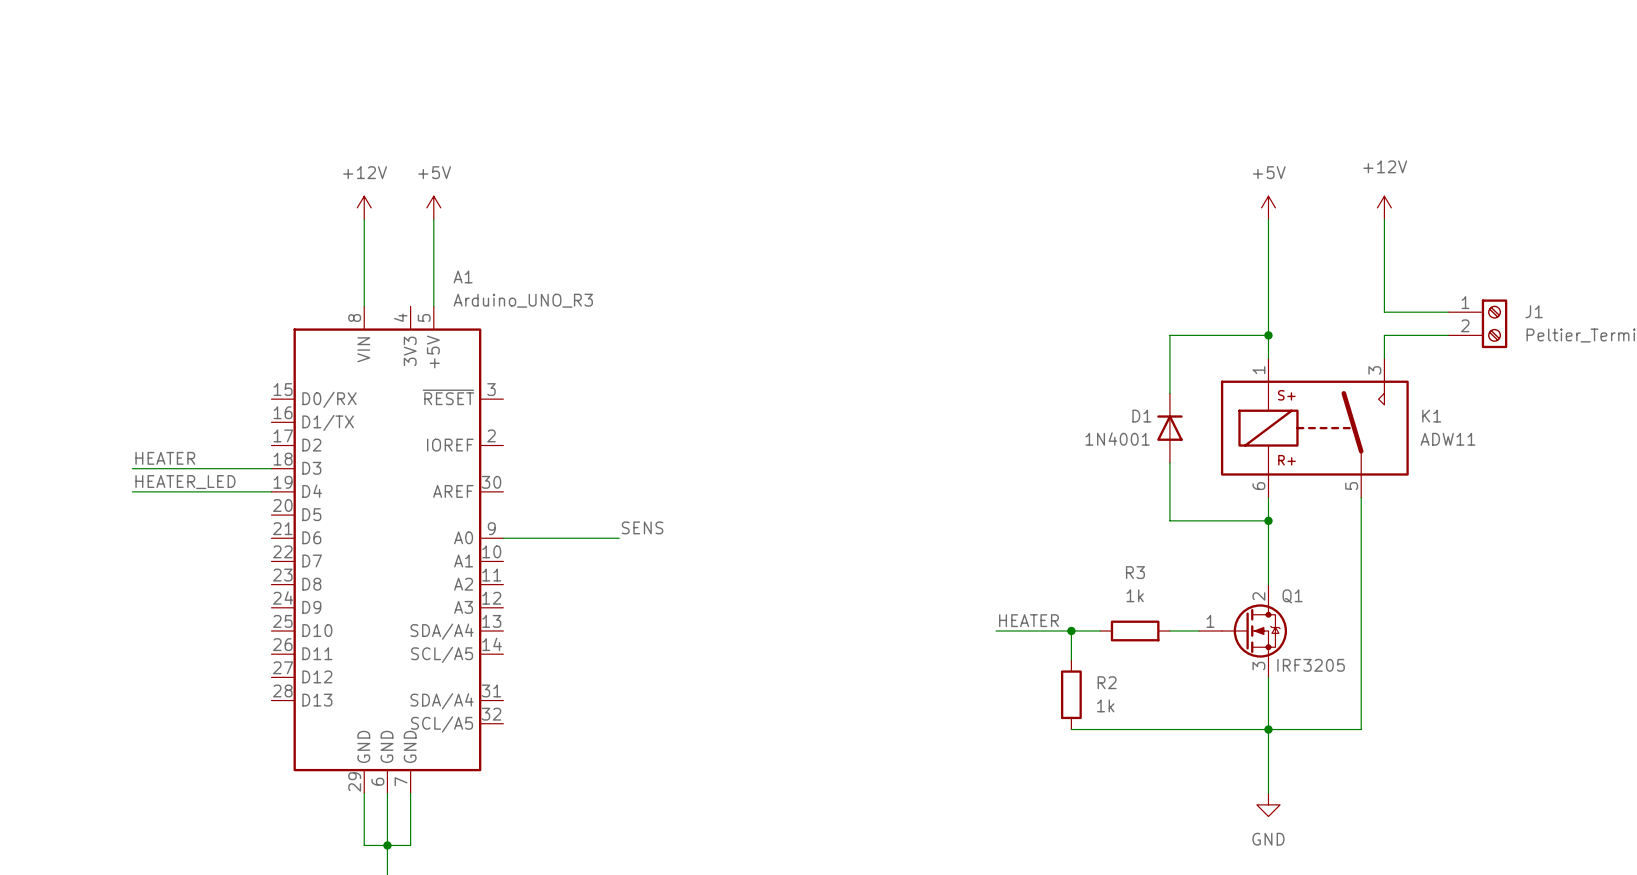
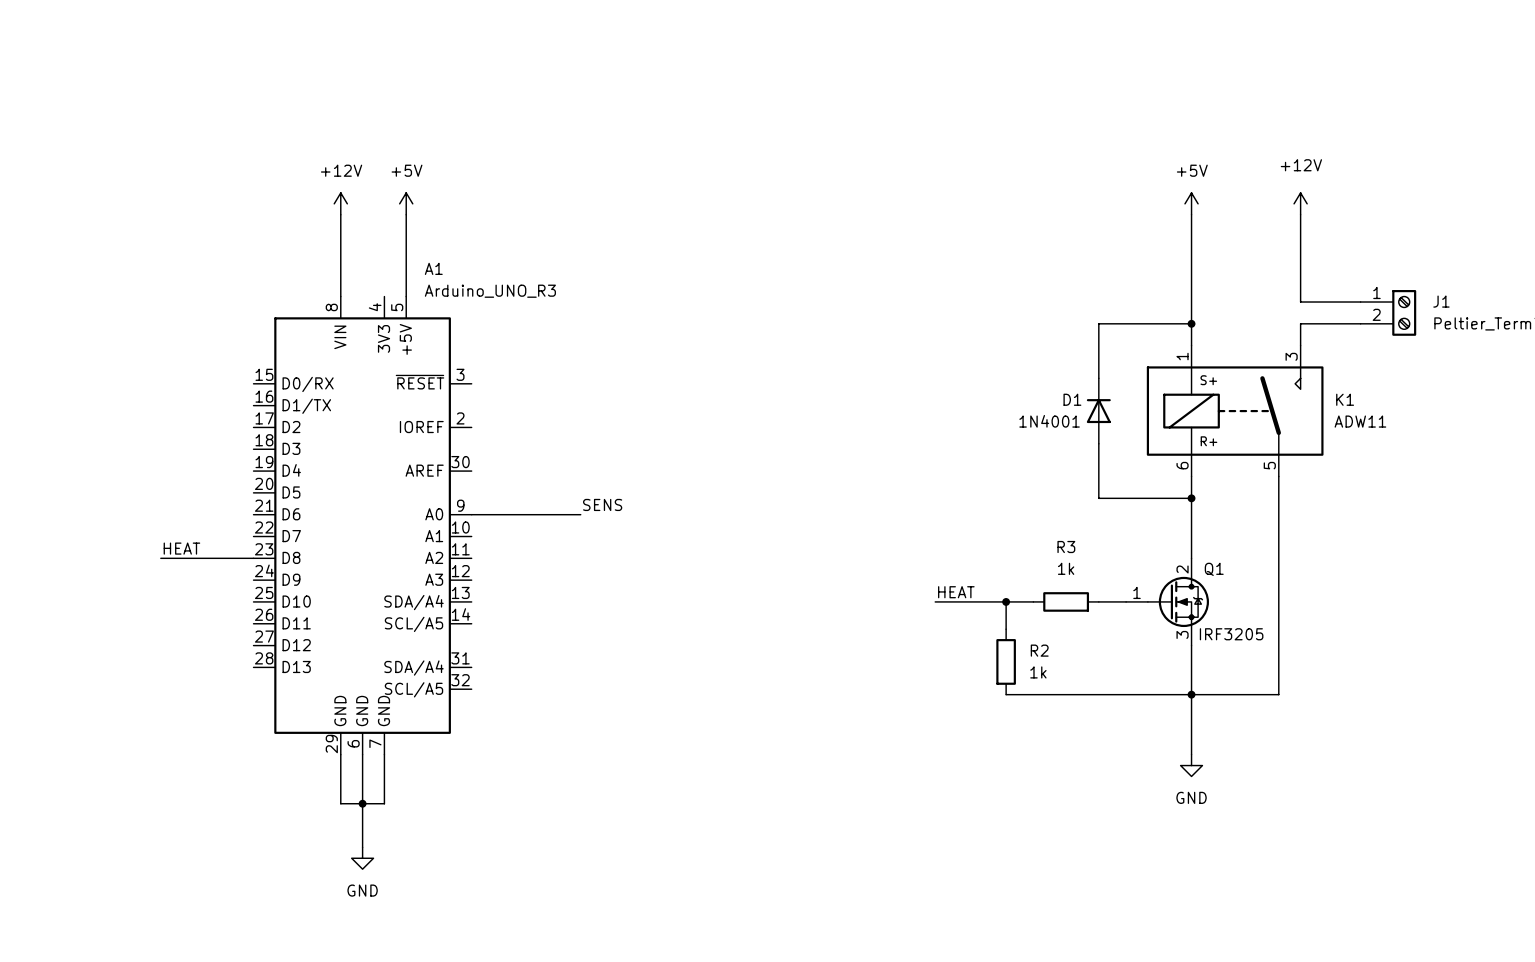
label: HEATER (165, 458) -> none
wire: (132, 468) (271, 468) -> none
label: HEATER_LED (185, 482) -> none
wire: (132, 491) (271, 491) -> none
label: none -> HEAT (181, 548)
wire: none -> (160, 558) (253, 558)
label: HEATER (1028, 620) -> HEAT (956, 592)

